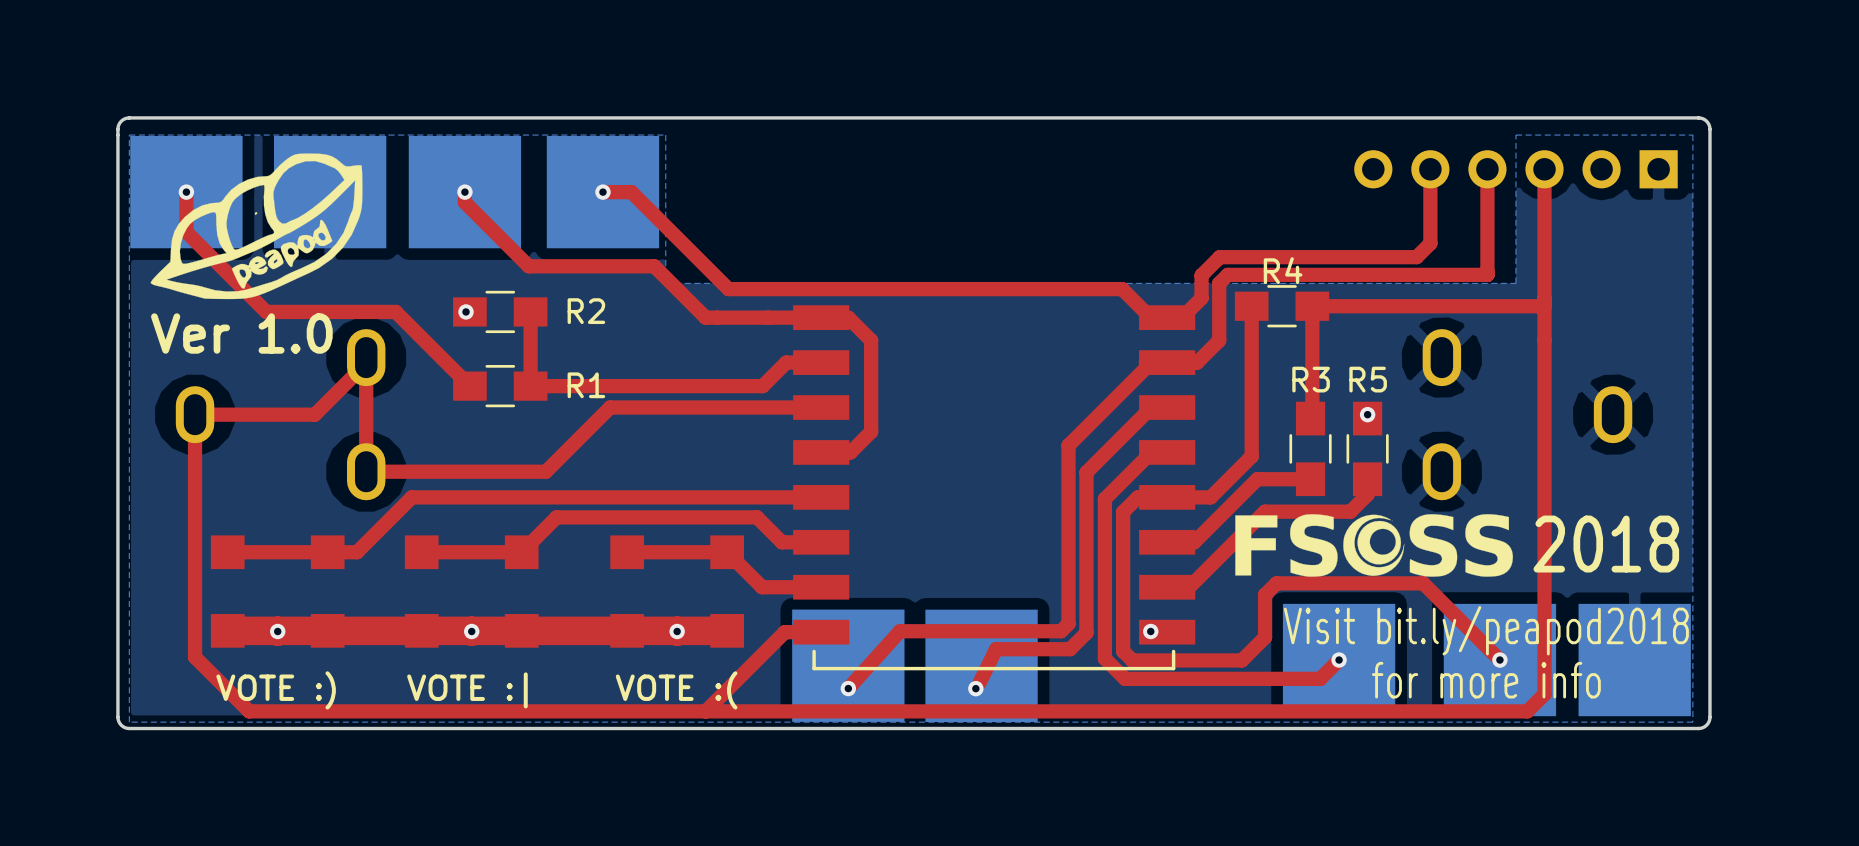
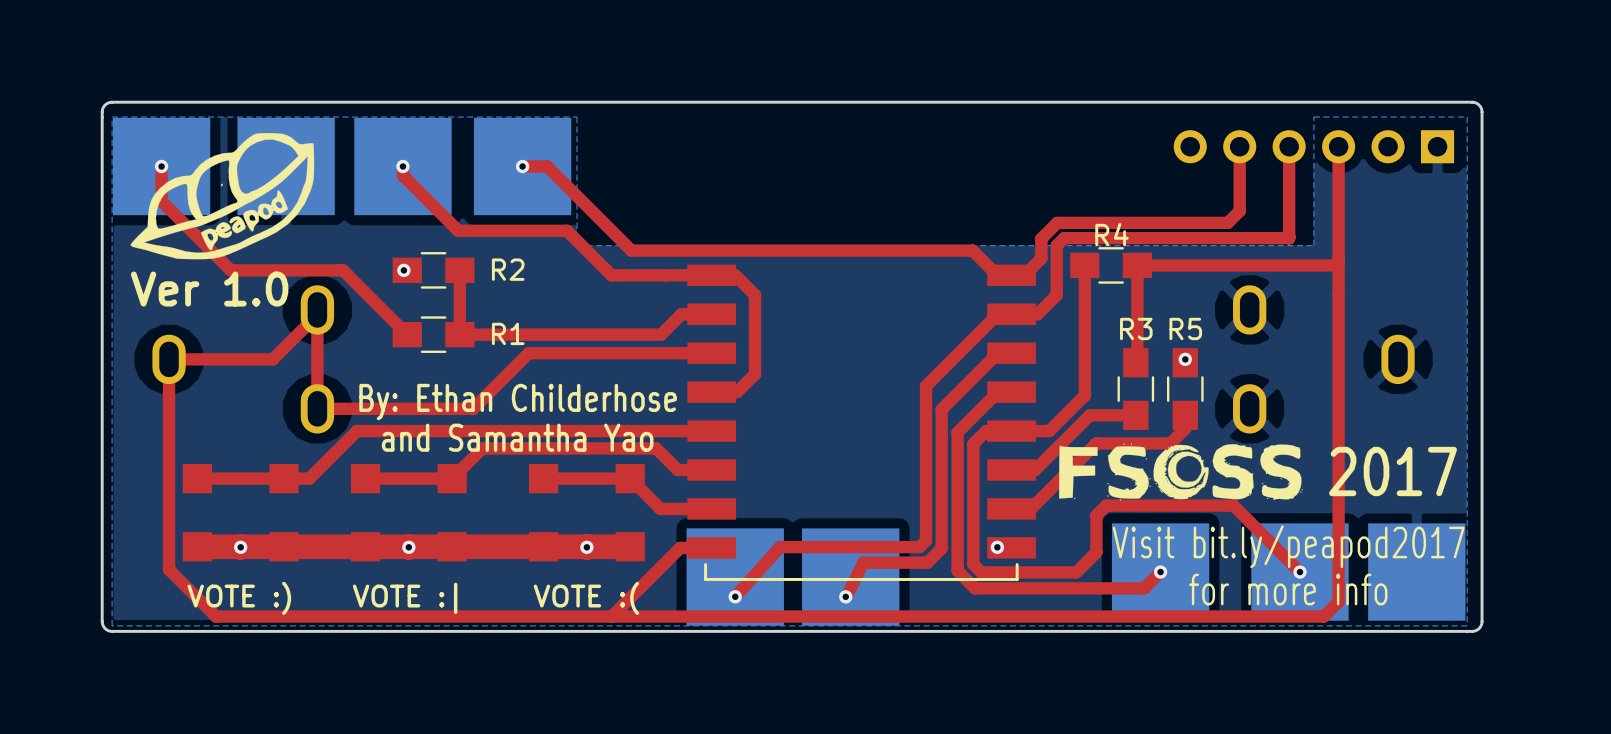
text: none -> By: Ethan Childerhose (518, 402)
text: none -> and Samantha Yao (517, 437)
drawing shape: [1235, 514, 1513, 577] -> [1059, 443, 1303, 501]
text: 2018 (1606, 544) -> 2017 (1393, 471)
text: Visit bit.ly/peapod2018 (1486, 630) -> Visit bit.ly/peapod2017 (1288, 546)

